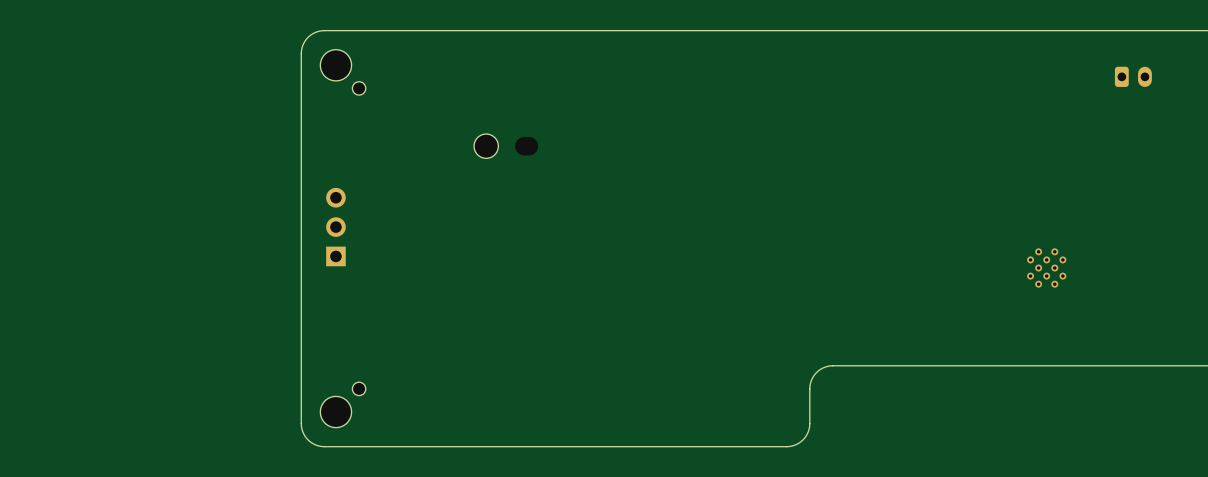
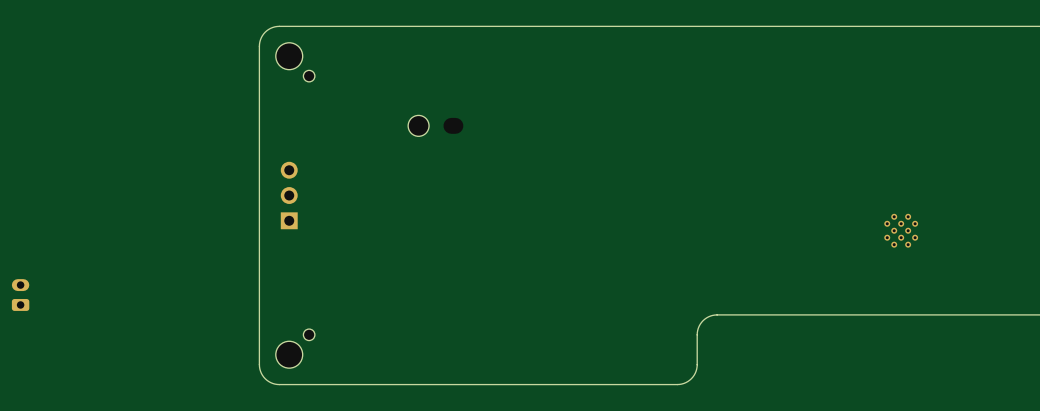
part: (1133, 76) -> none
part: none -> (20, 295)

